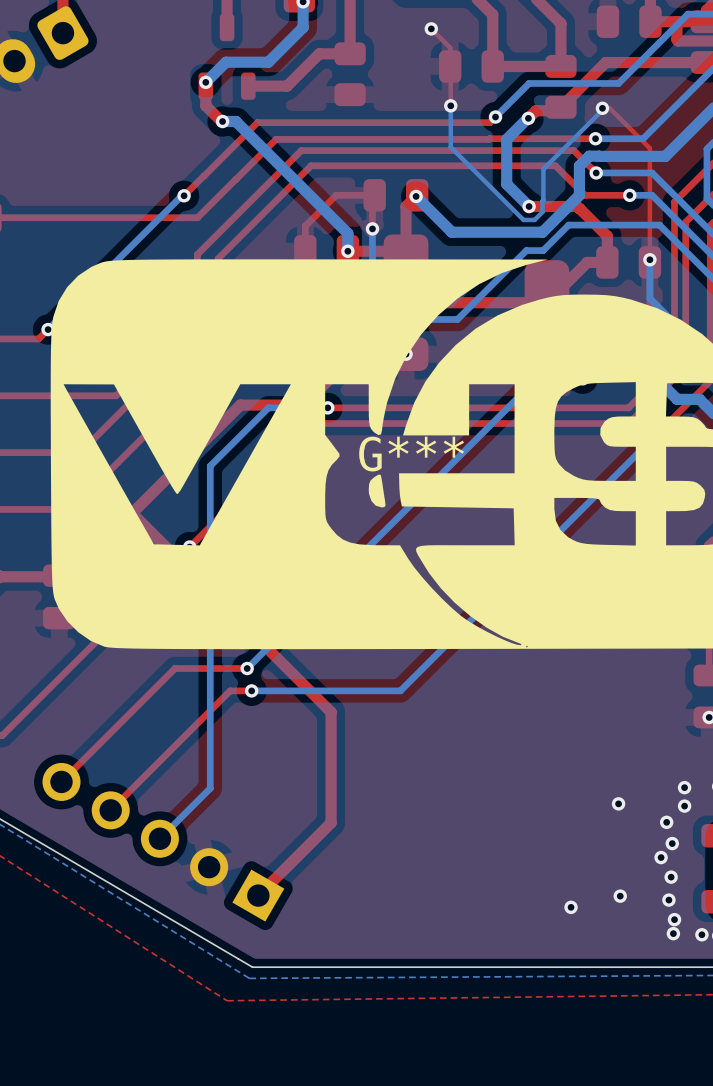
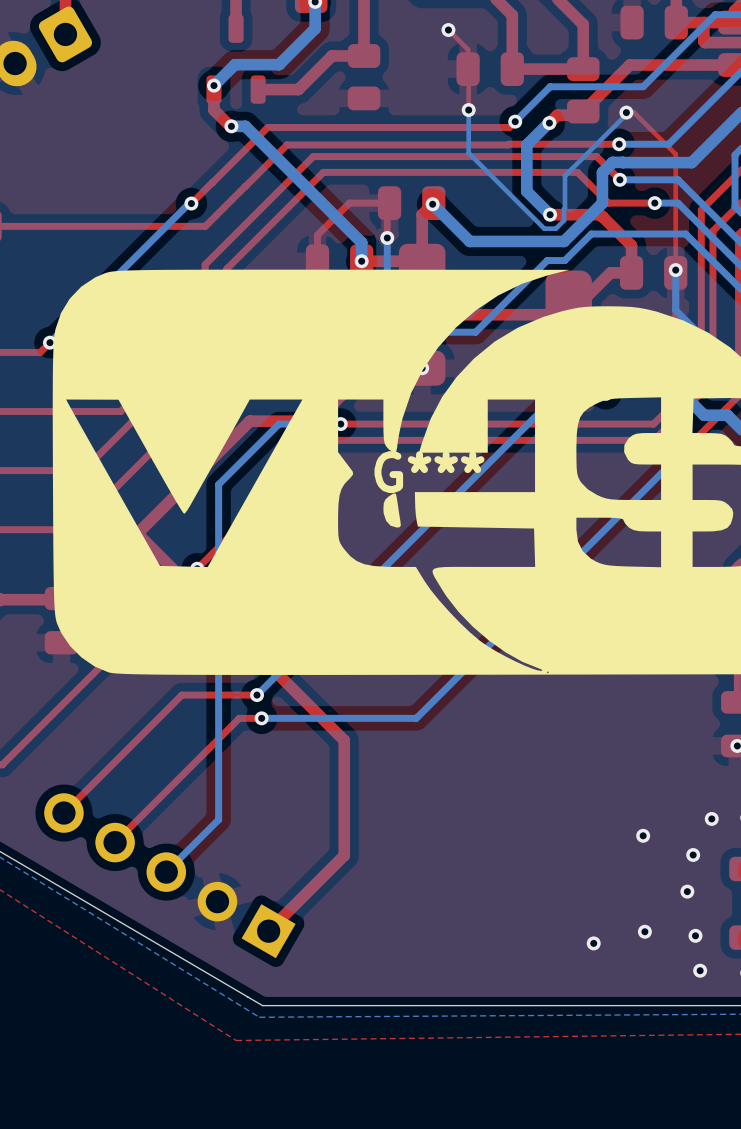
via: (684, 806) -> none
via: (672, 843) -> none
via: (671, 877) -> none
via: (674, 919) -> none
via: (701, 934) -> none

